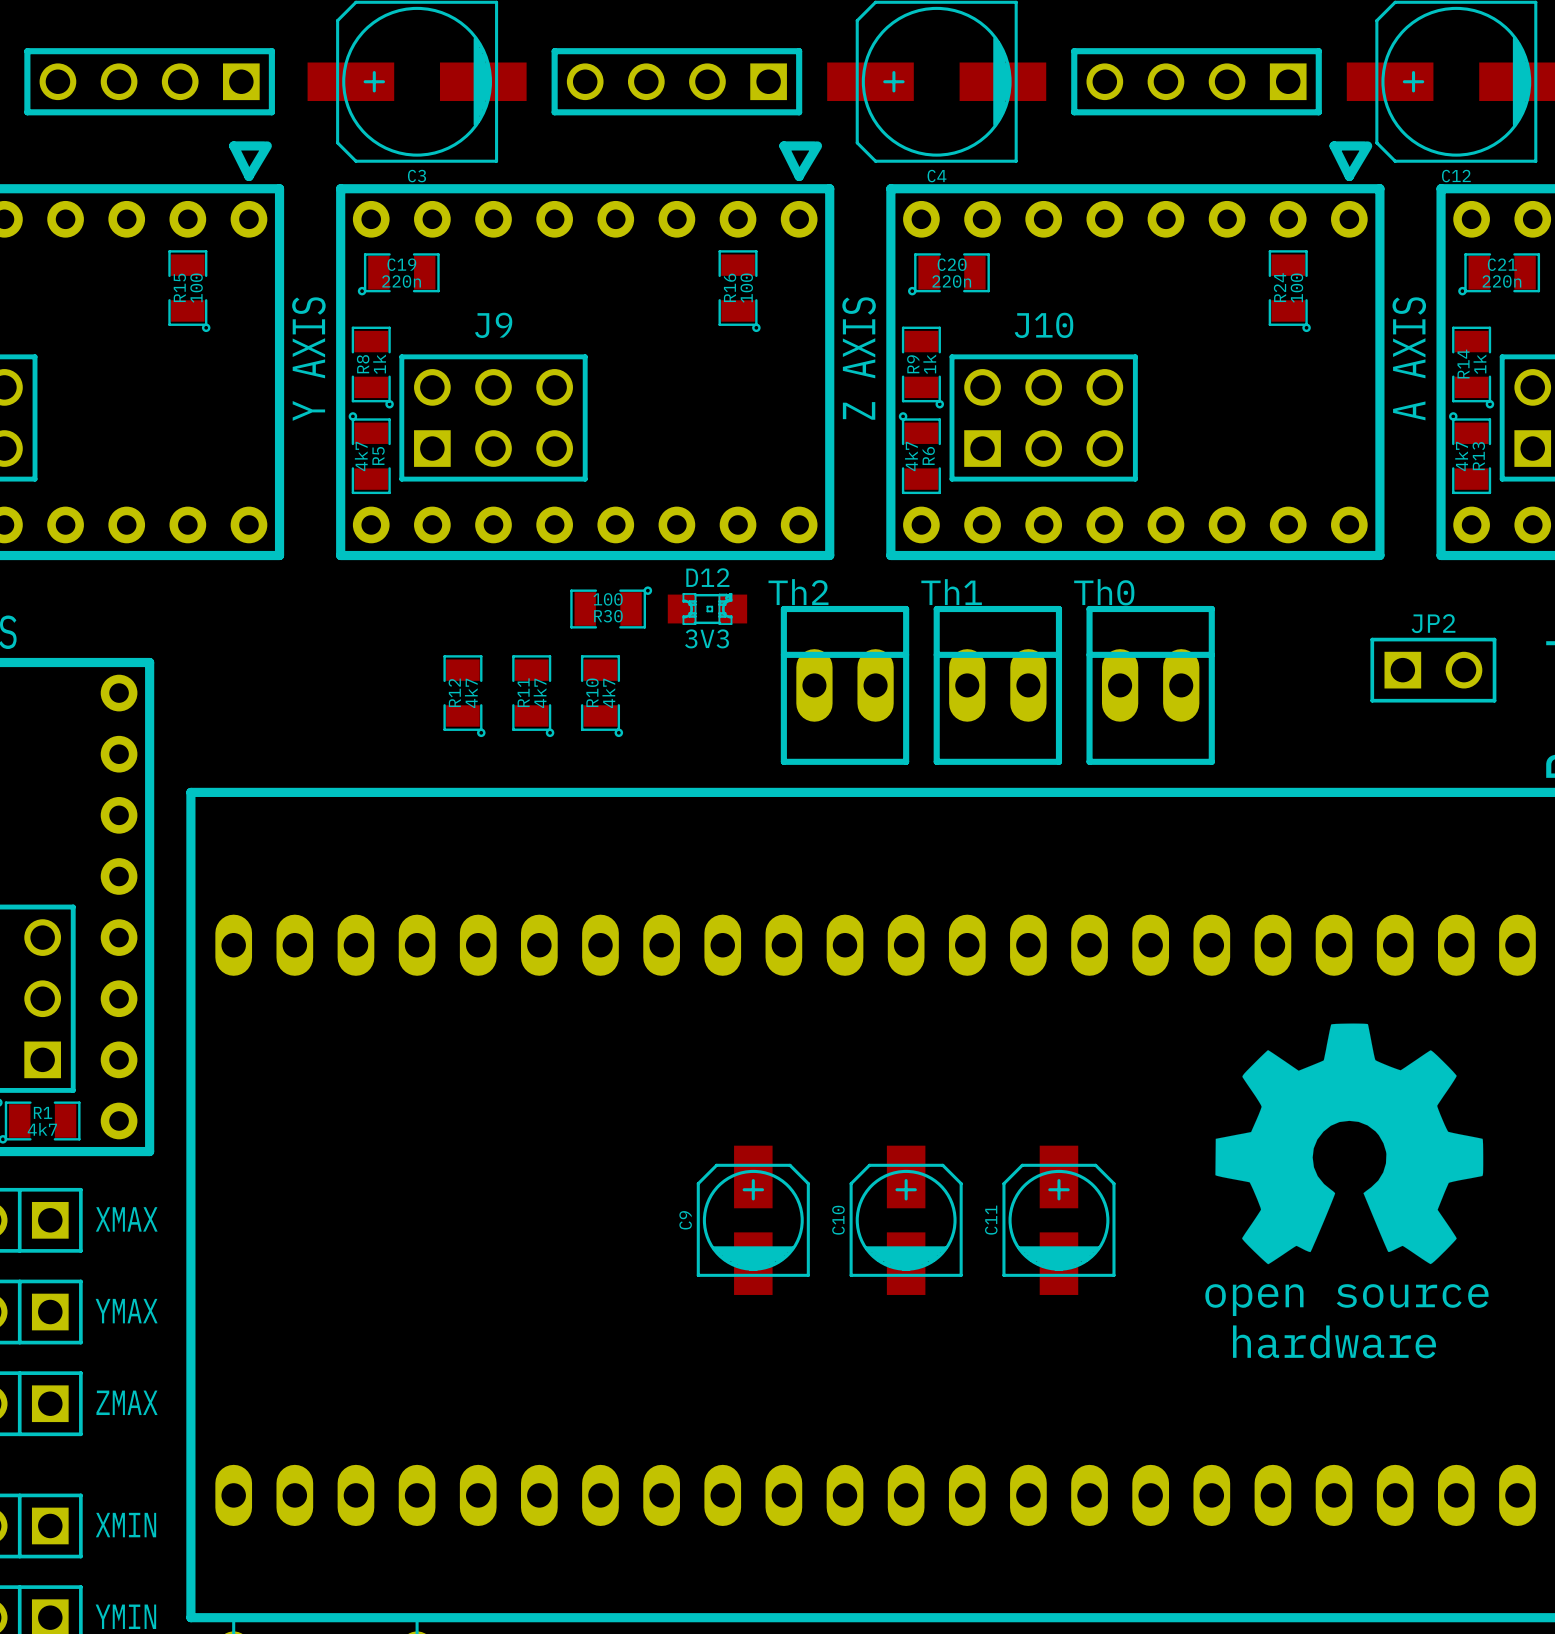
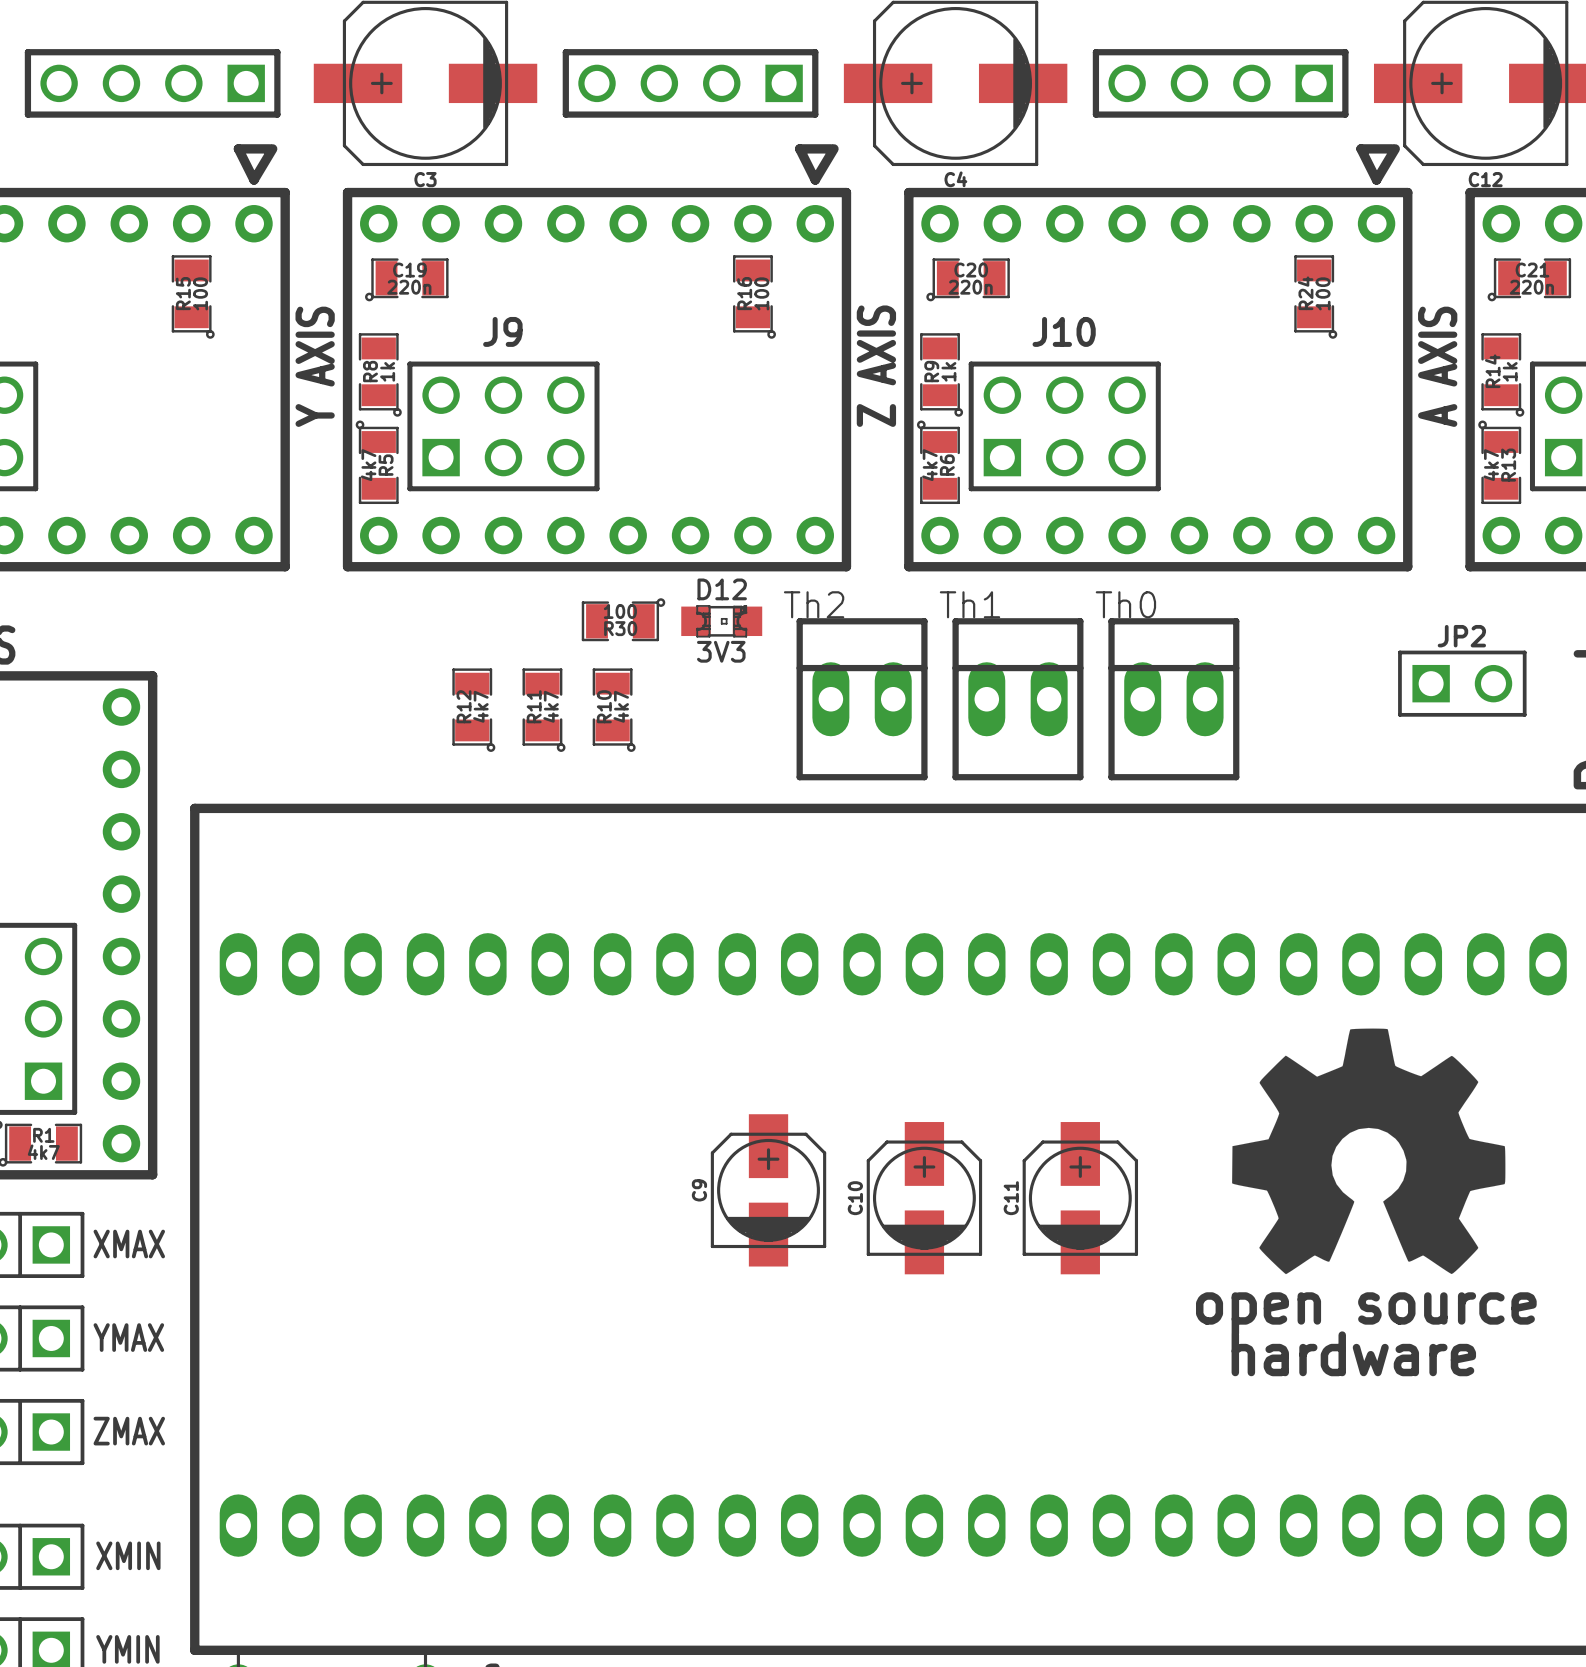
drawing shape: [1205, 1023, 1489, 1359] -> [1195, 1028, 1537, 1377]
C9 position: (753, 1220) -> (768, 1190)
C10 position: (906, 1220) -> (924, 1198)
C11 position: (1058, 1220) -> (1080, 1198)

